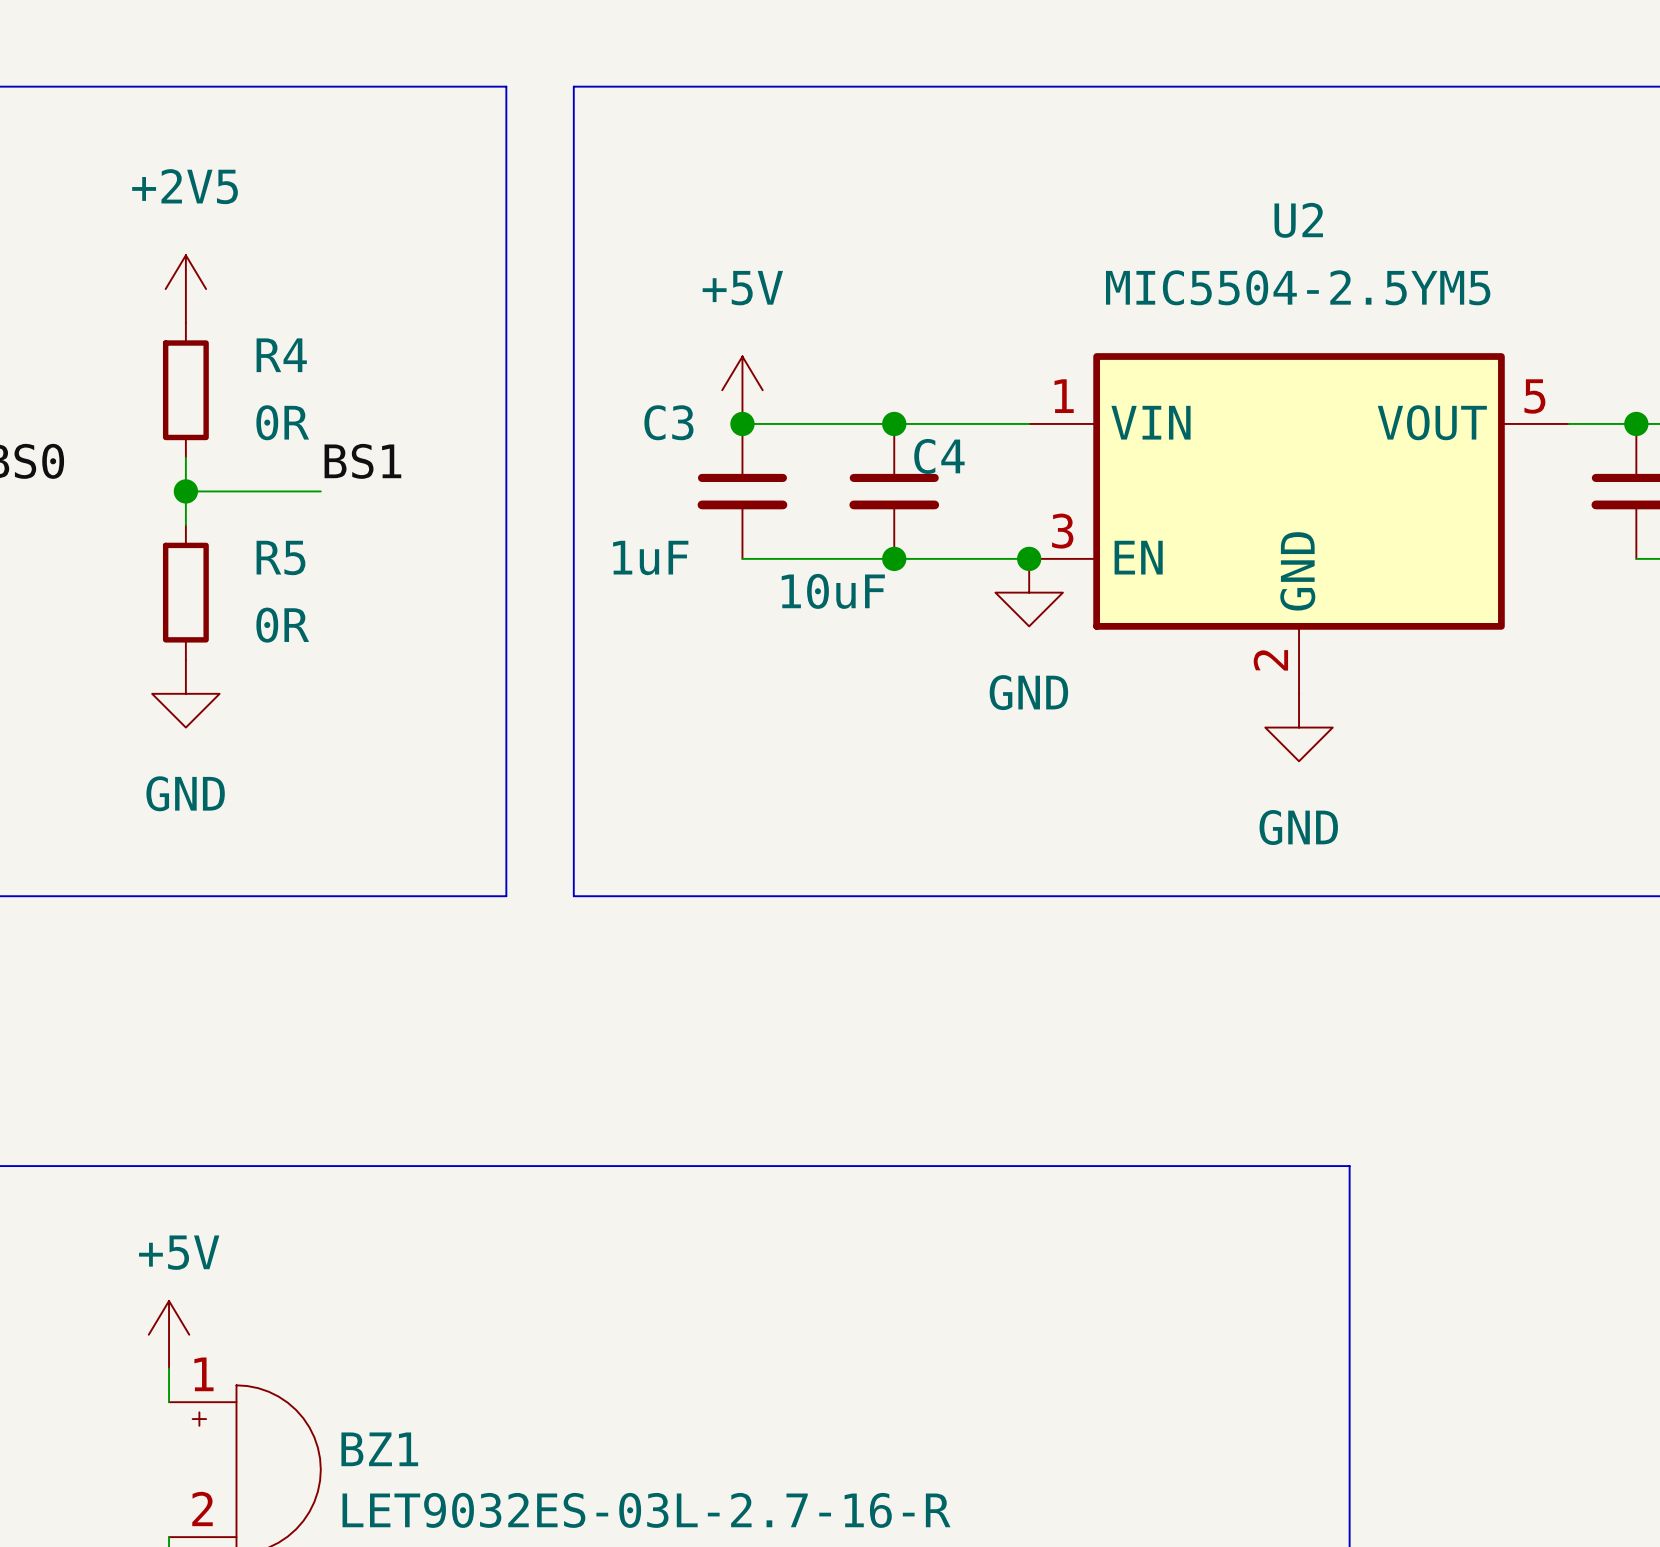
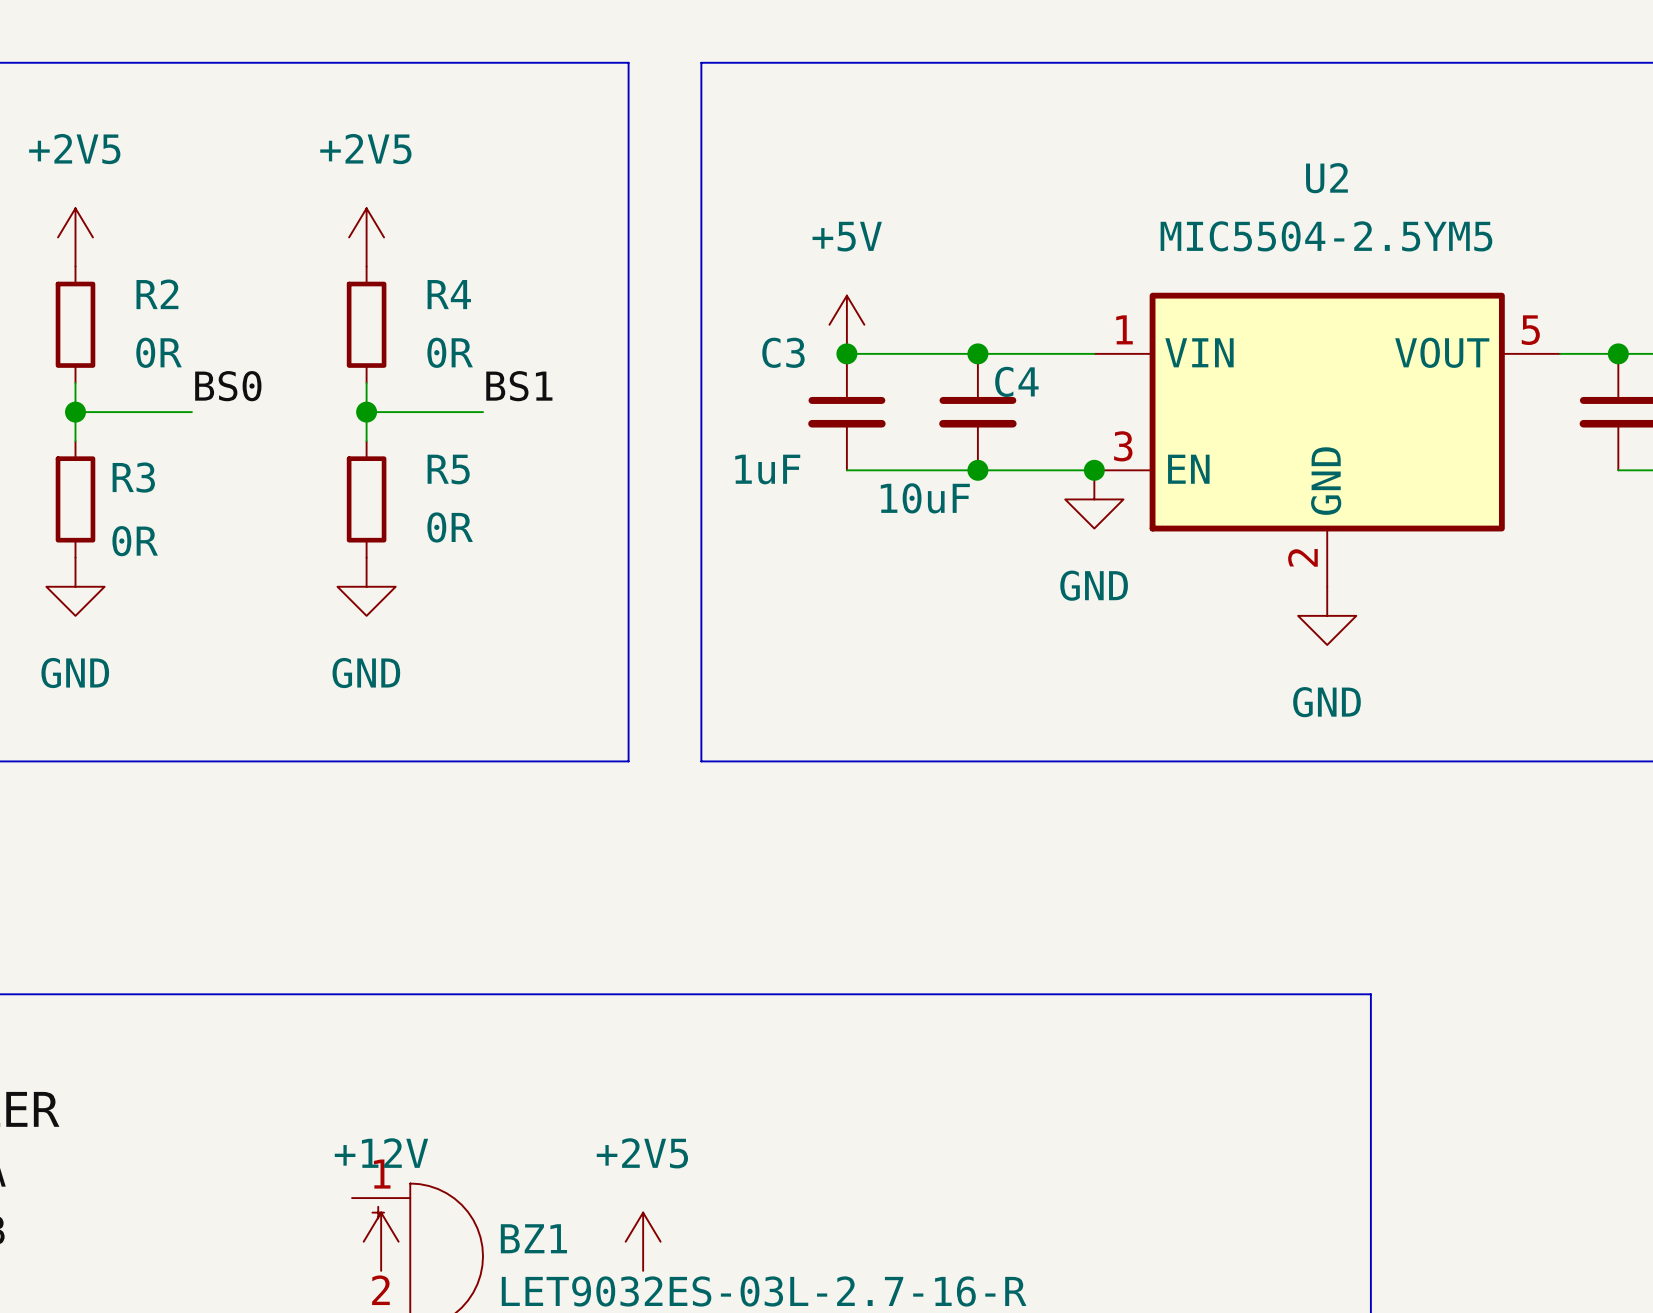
line: (489, 86) (506, 86) (506, 896) (489, 896) -> (628, 62) (628, 761)
power symbol: +5V (169, 1334) -> none
wire: (169, 1368) (169, 1402) -> none
power symbol: none -> +12V (381, 1241)
power symbol: none -> +2V5 (643, 1241)

